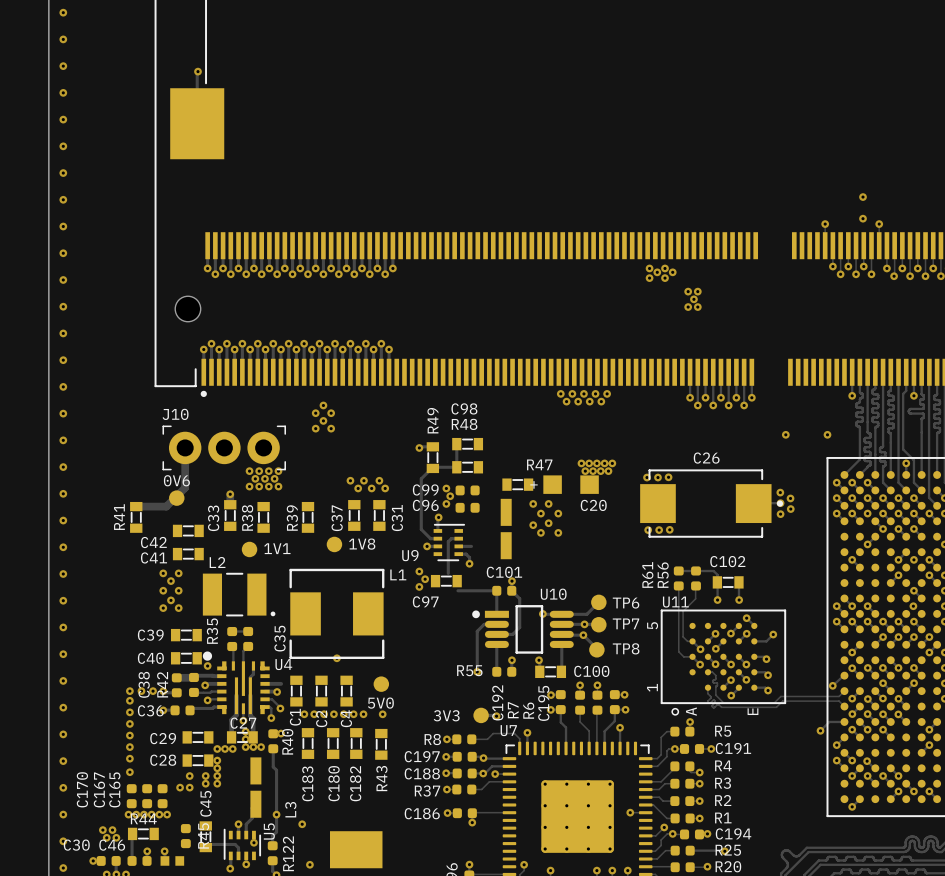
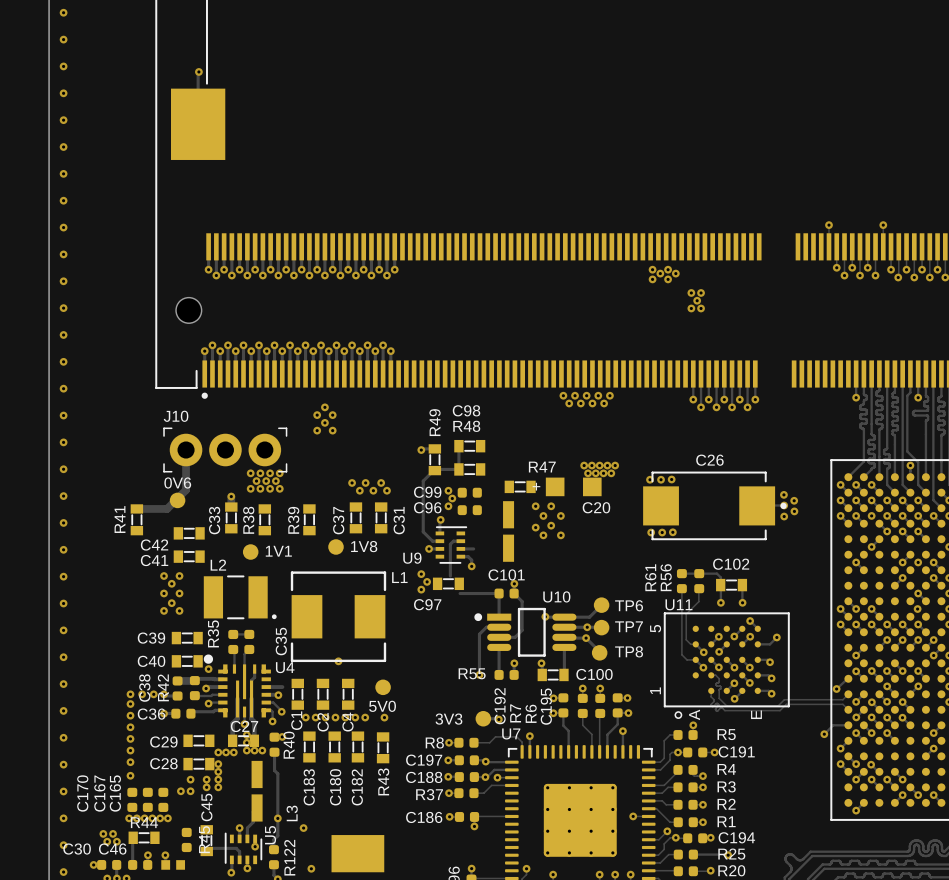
via: (863, 197) -> none
via: (863, 218) -> none
via: (785, 434) -> none
via: (827, 434) -> none

